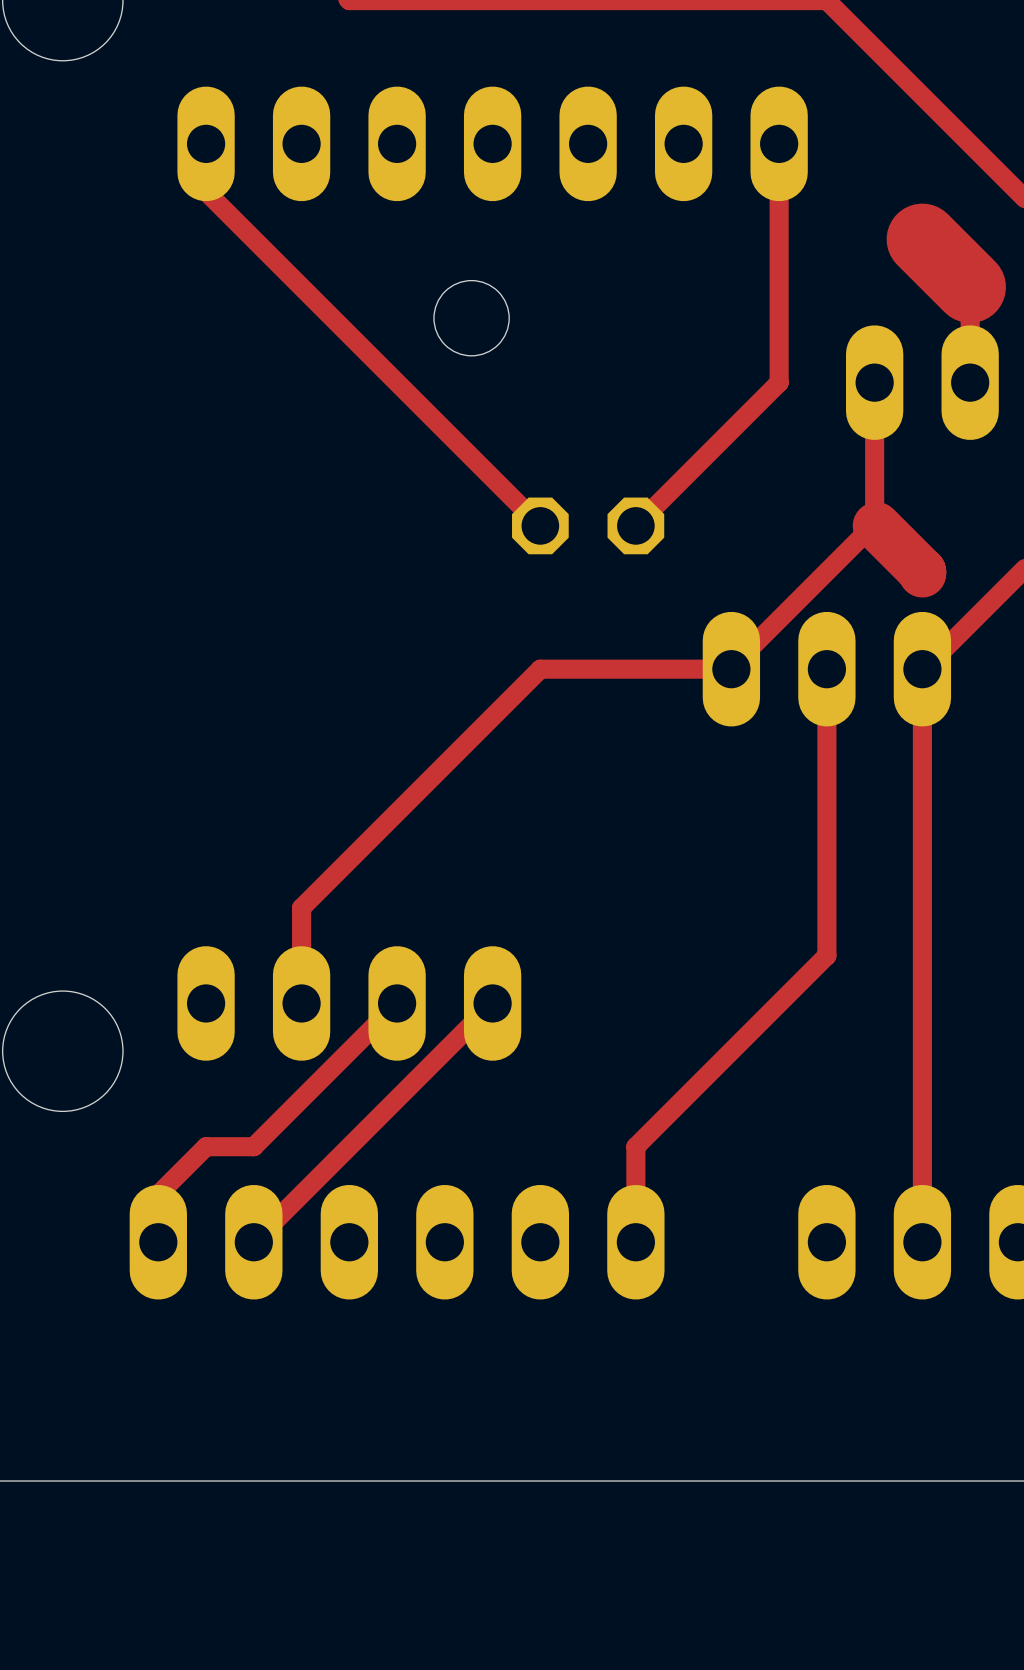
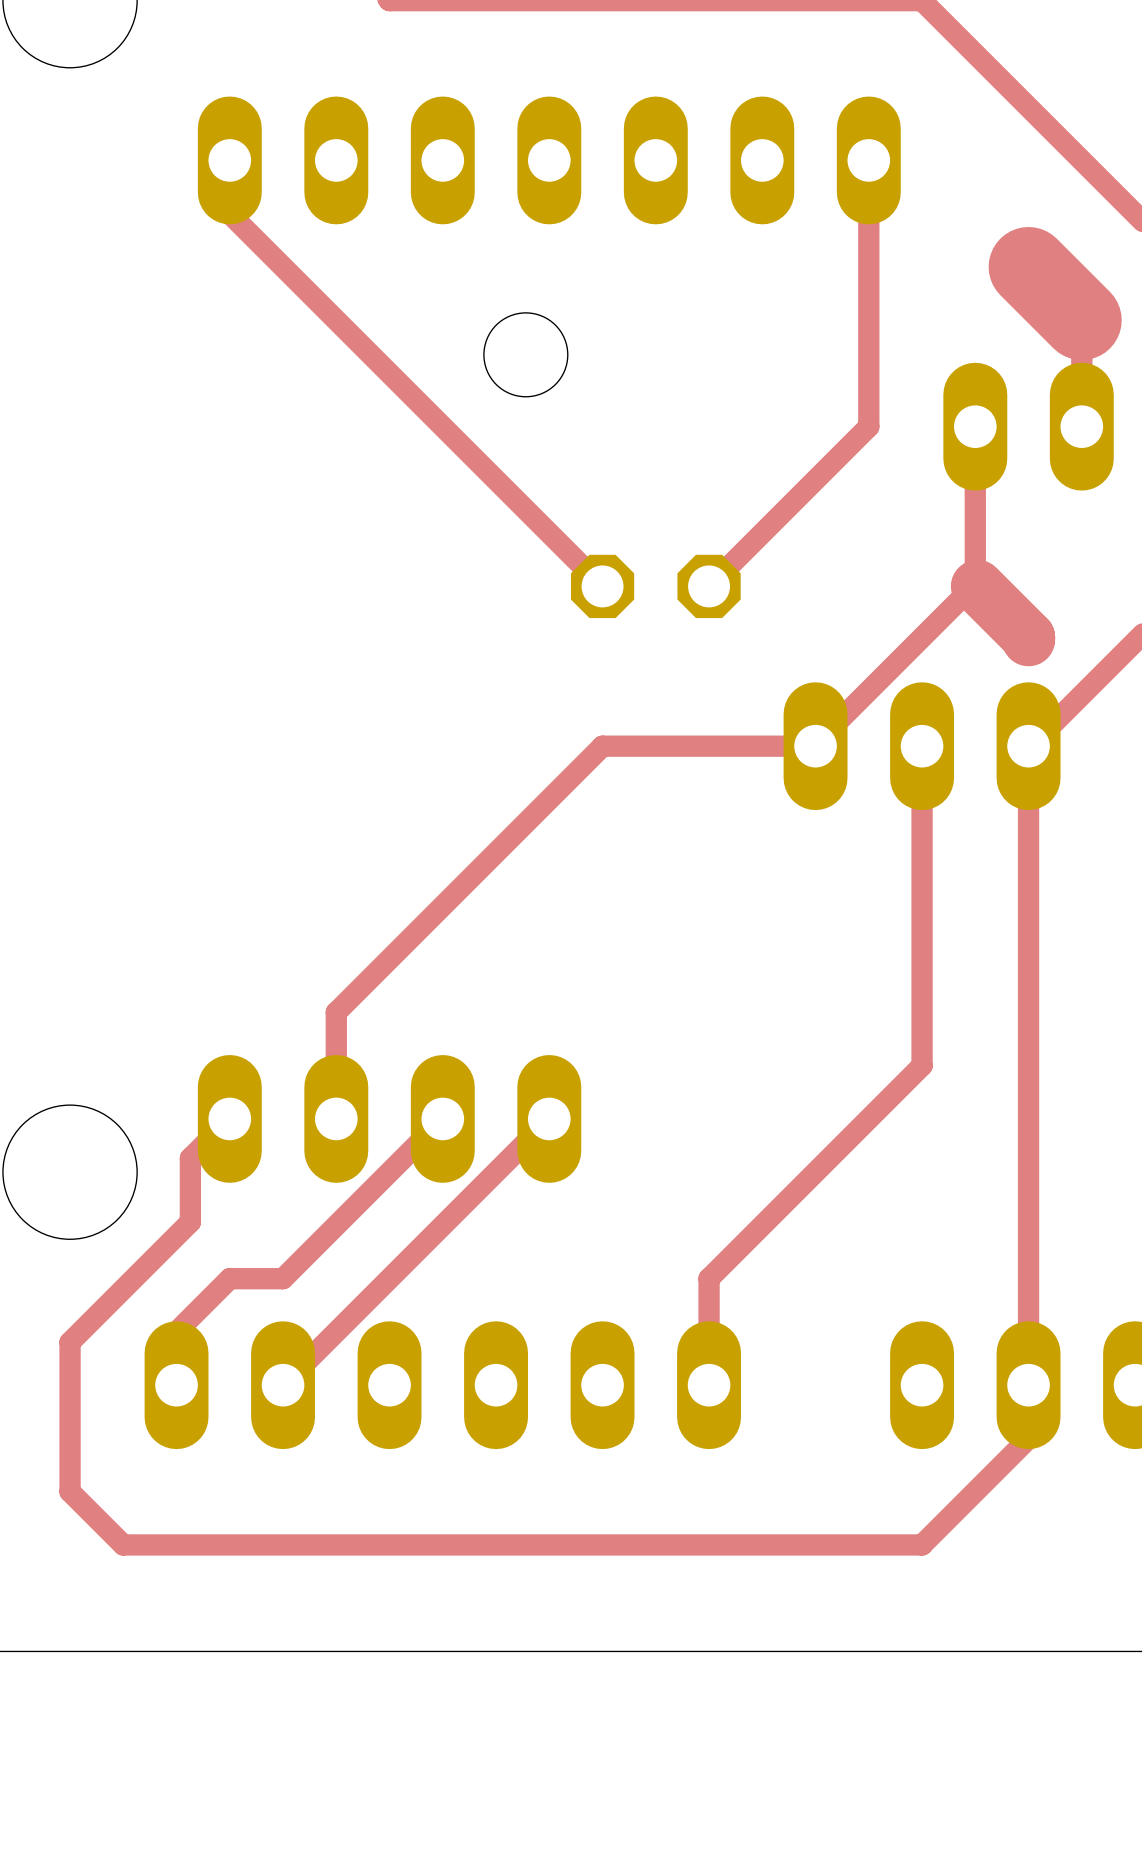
top track: none -> (229, 1118) (190, 1158) (190, 1222) (70, 1342) (70, 1491) (123, 1544) (922, 1544) (1028, 1438) (1028, 1385)

